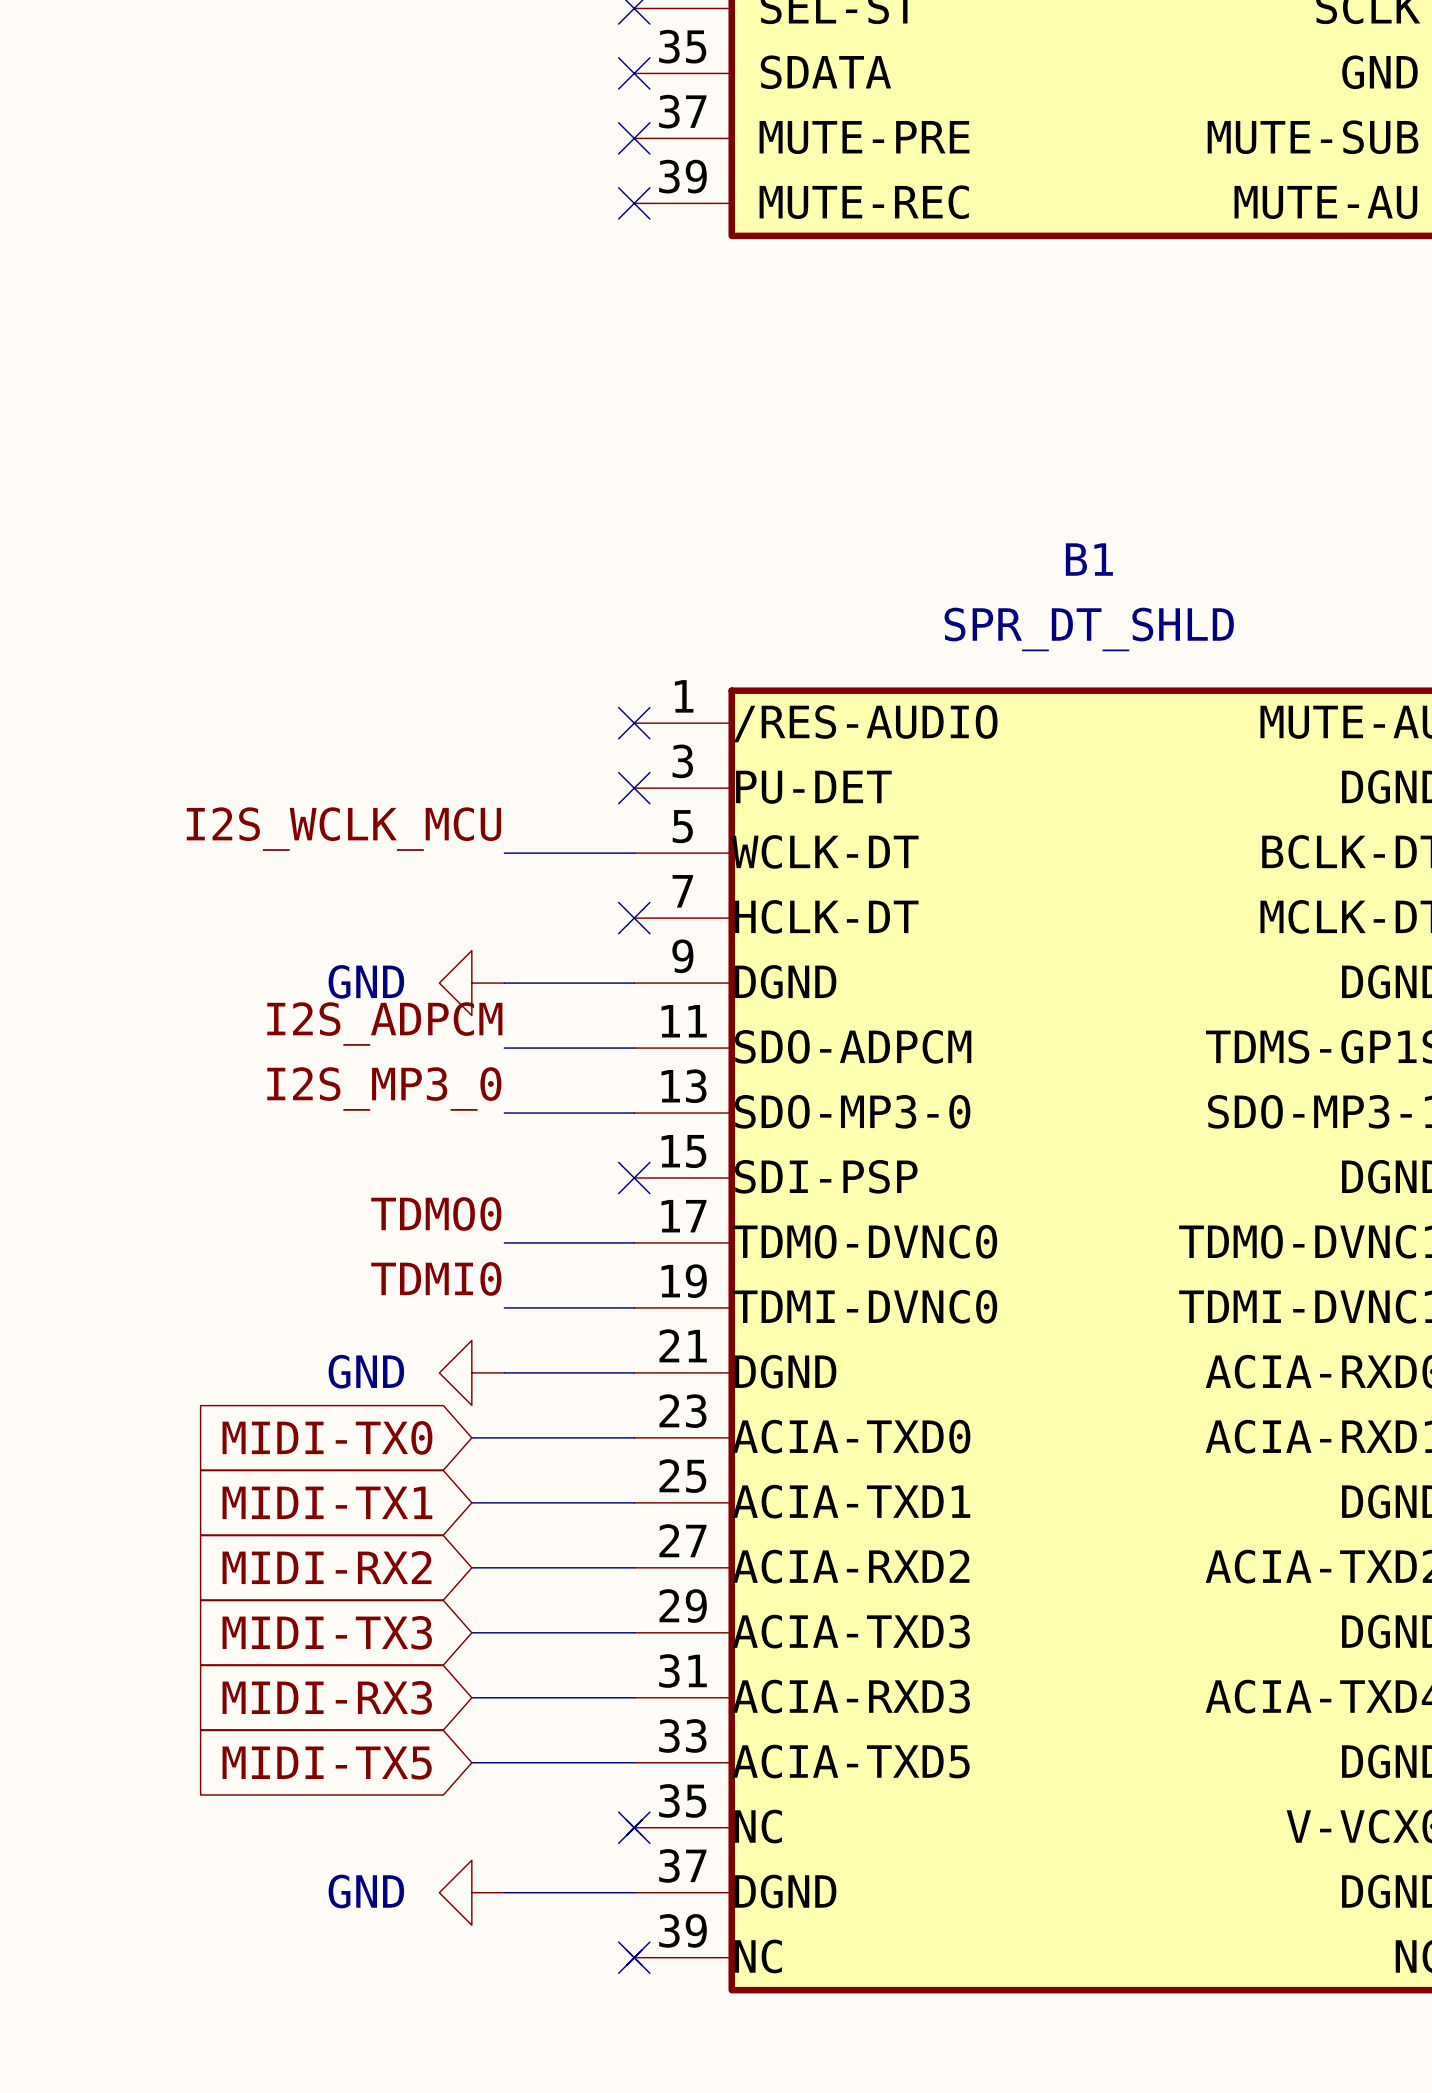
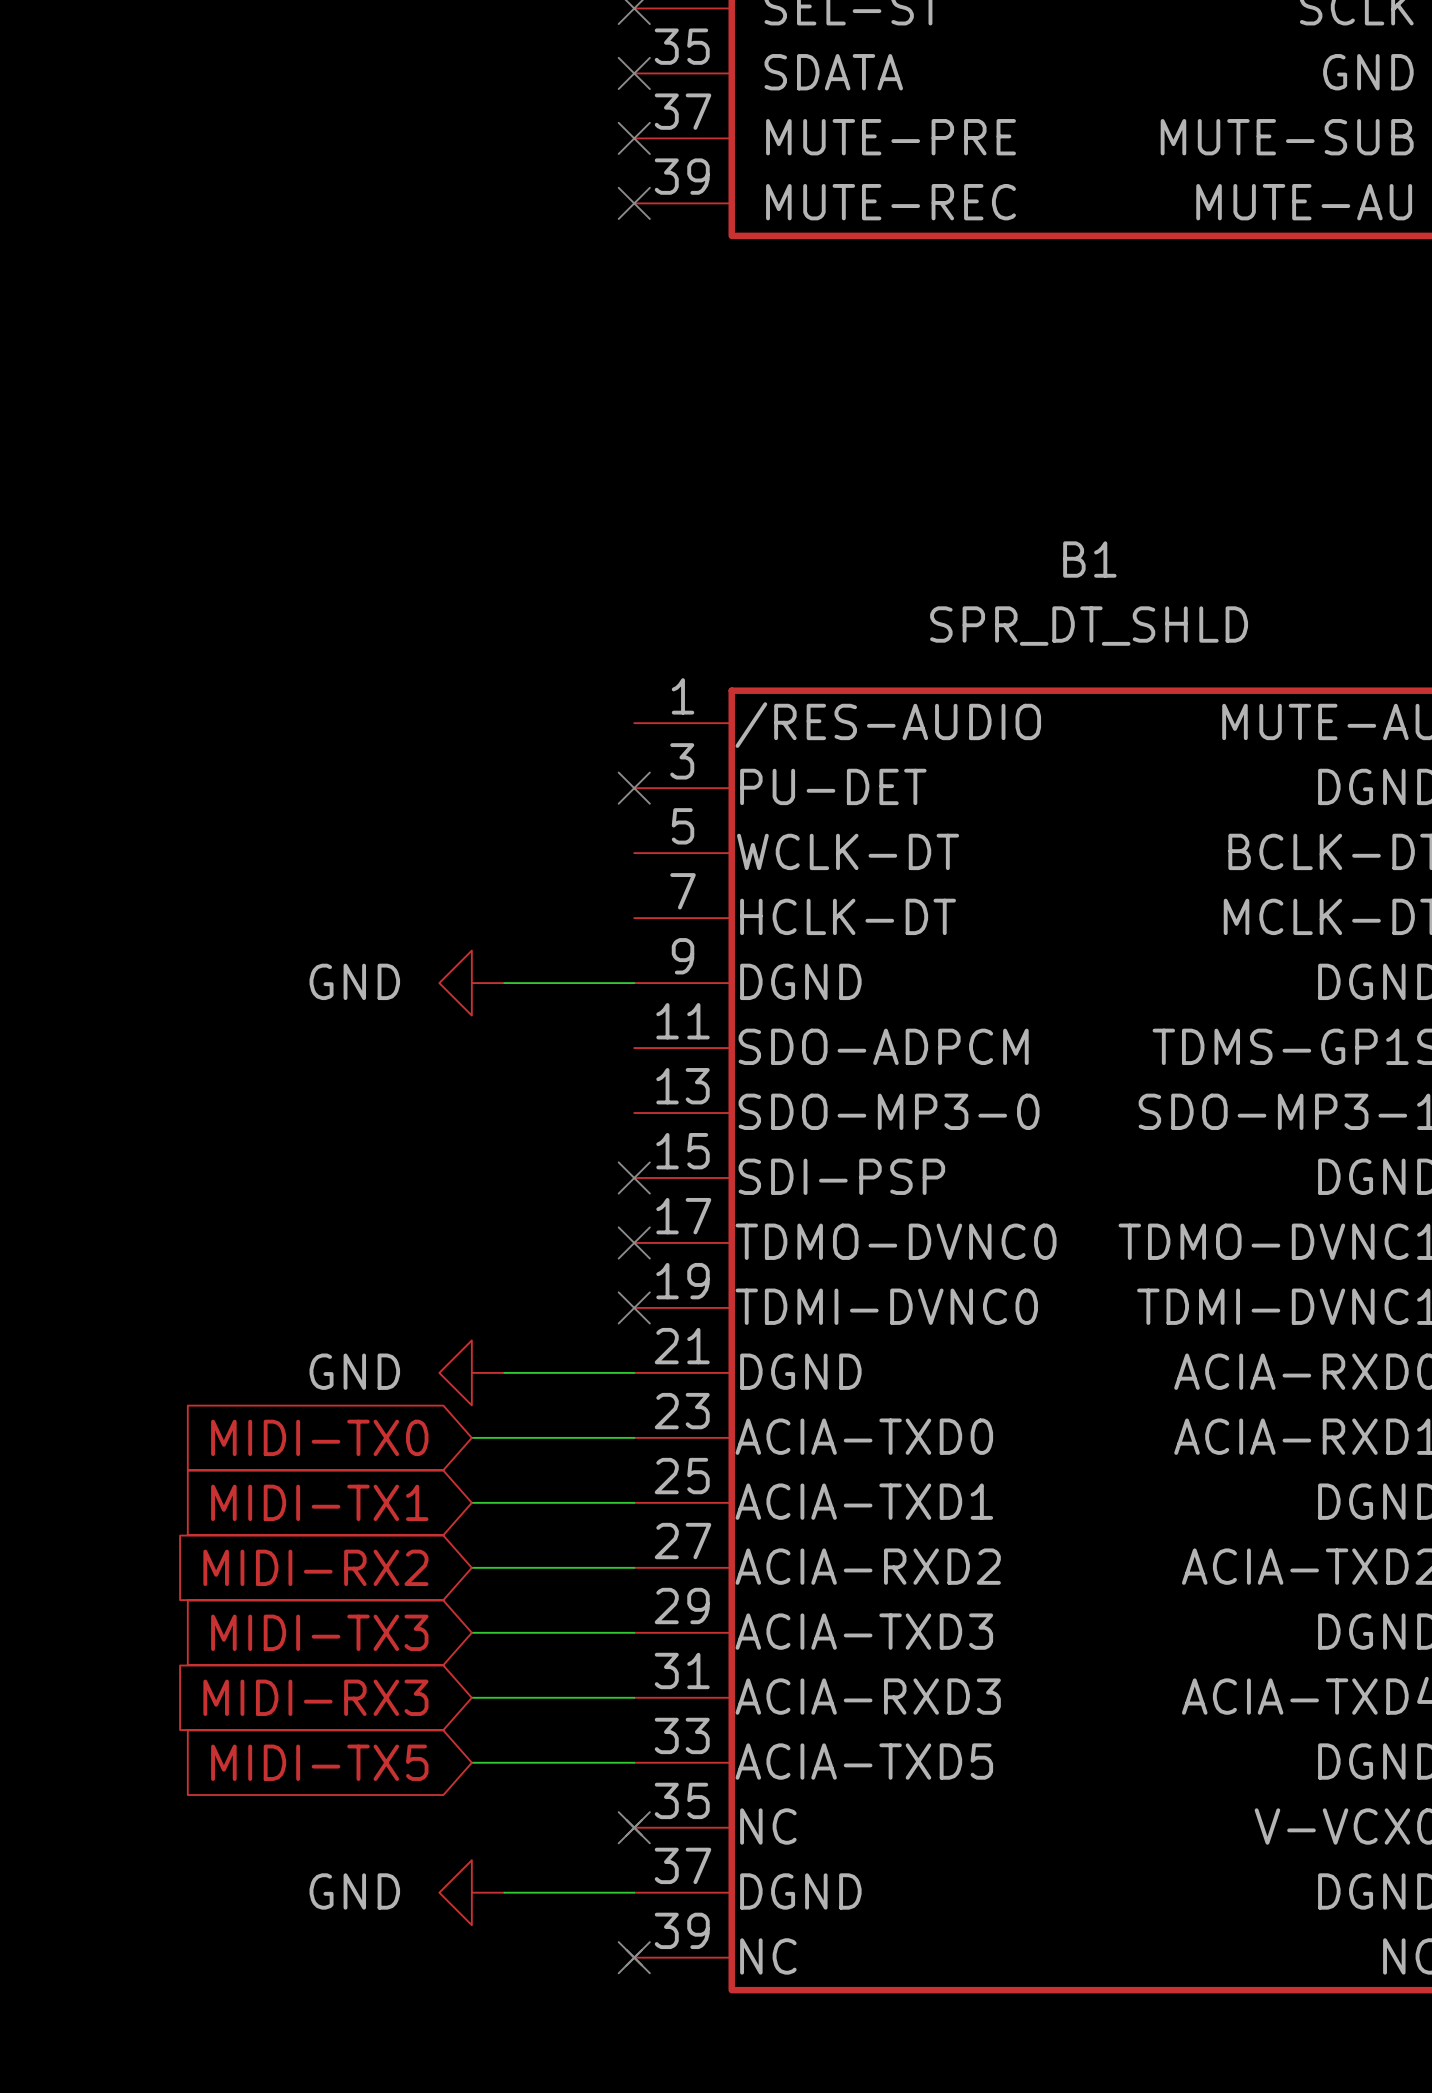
no-connect mark: (634, 723) -> none
label: I2S_WCLK_MCU (343, 829) -> none
wire: (504, 853) (634, 853) -> none
no-connect mark: (634, 918) -> none
label: I2S_ADPCM (384, 1024) -> none
wire: (504, 1048) (634, 1048) -> none
label: I2S_MP3_0 (384, 1088) -> none
wire: (504, 1113) (634, 1113) -> none
label: TDMO0 (436, 1214) -> none
wire: (504, 1242) (634, 1242) -> none
no-connect mark: none -> (634, 1242)
label: TDMI0 (436, 1278) -> none
wire: (504, 1307) (634, 1307) -> none
no-connect mark: none -> (634, 1307)

